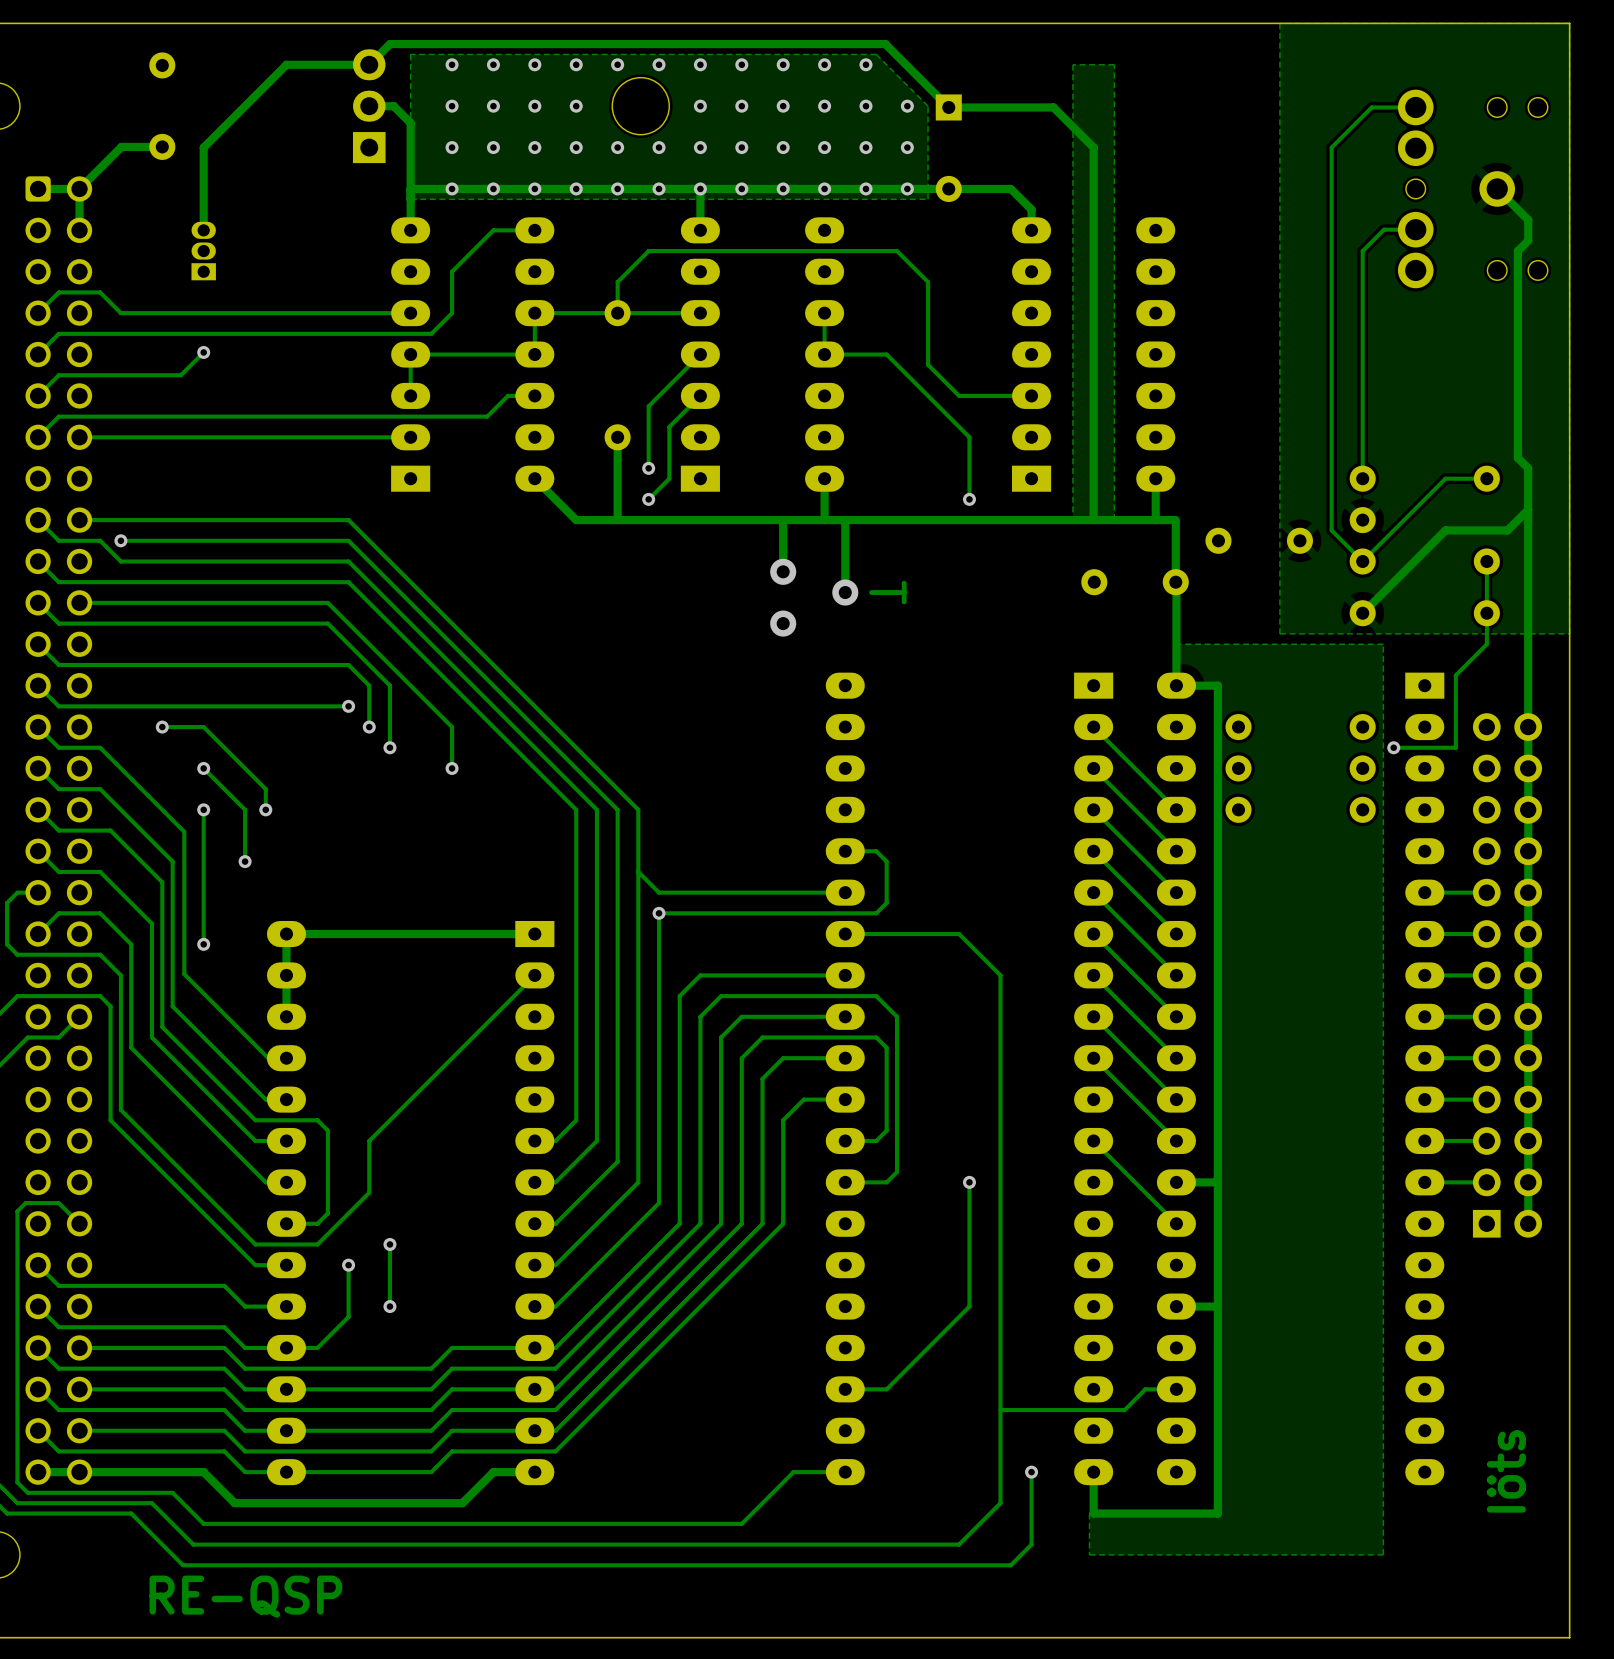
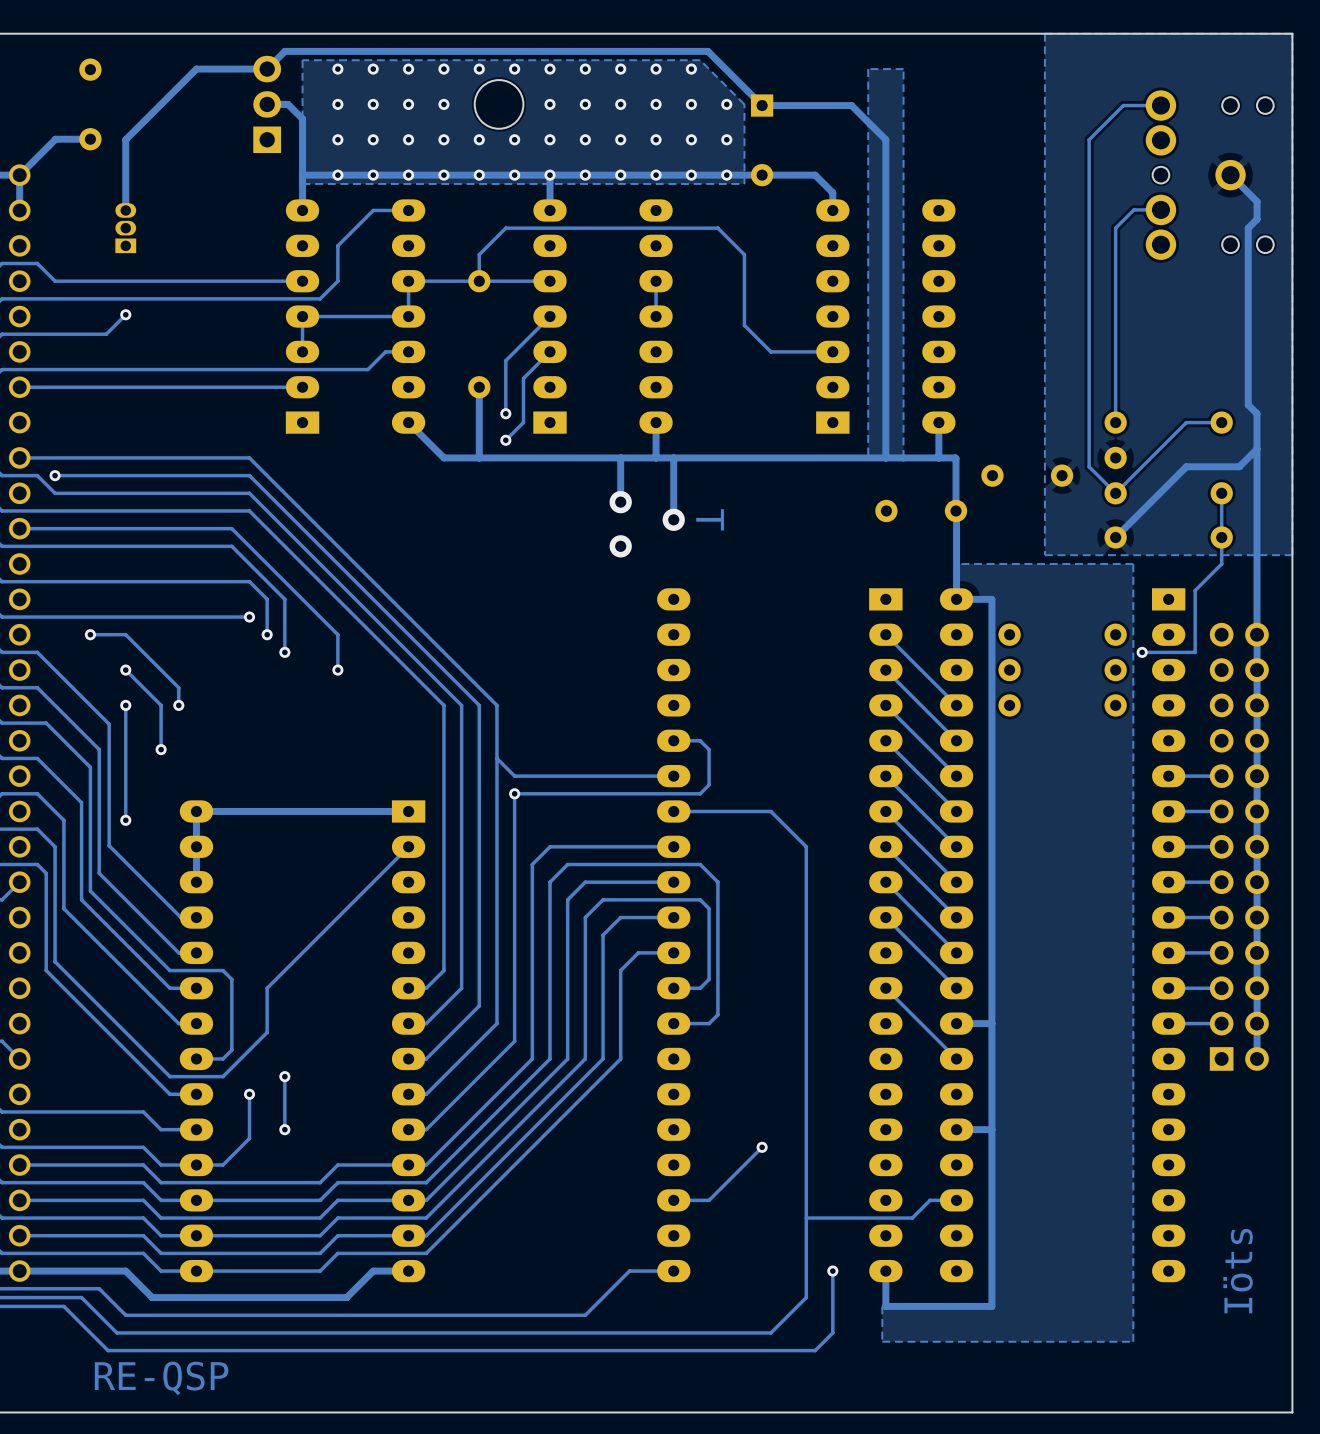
track: (824, 354) (886, 354) (969, 437) (969, 499) -> none
via: (969, 499) -> none
track: (969, 1182) (969, 1306) (948, 1327) -> none
via: (969, 1182) -> none
via: none -> (762, 1147)

